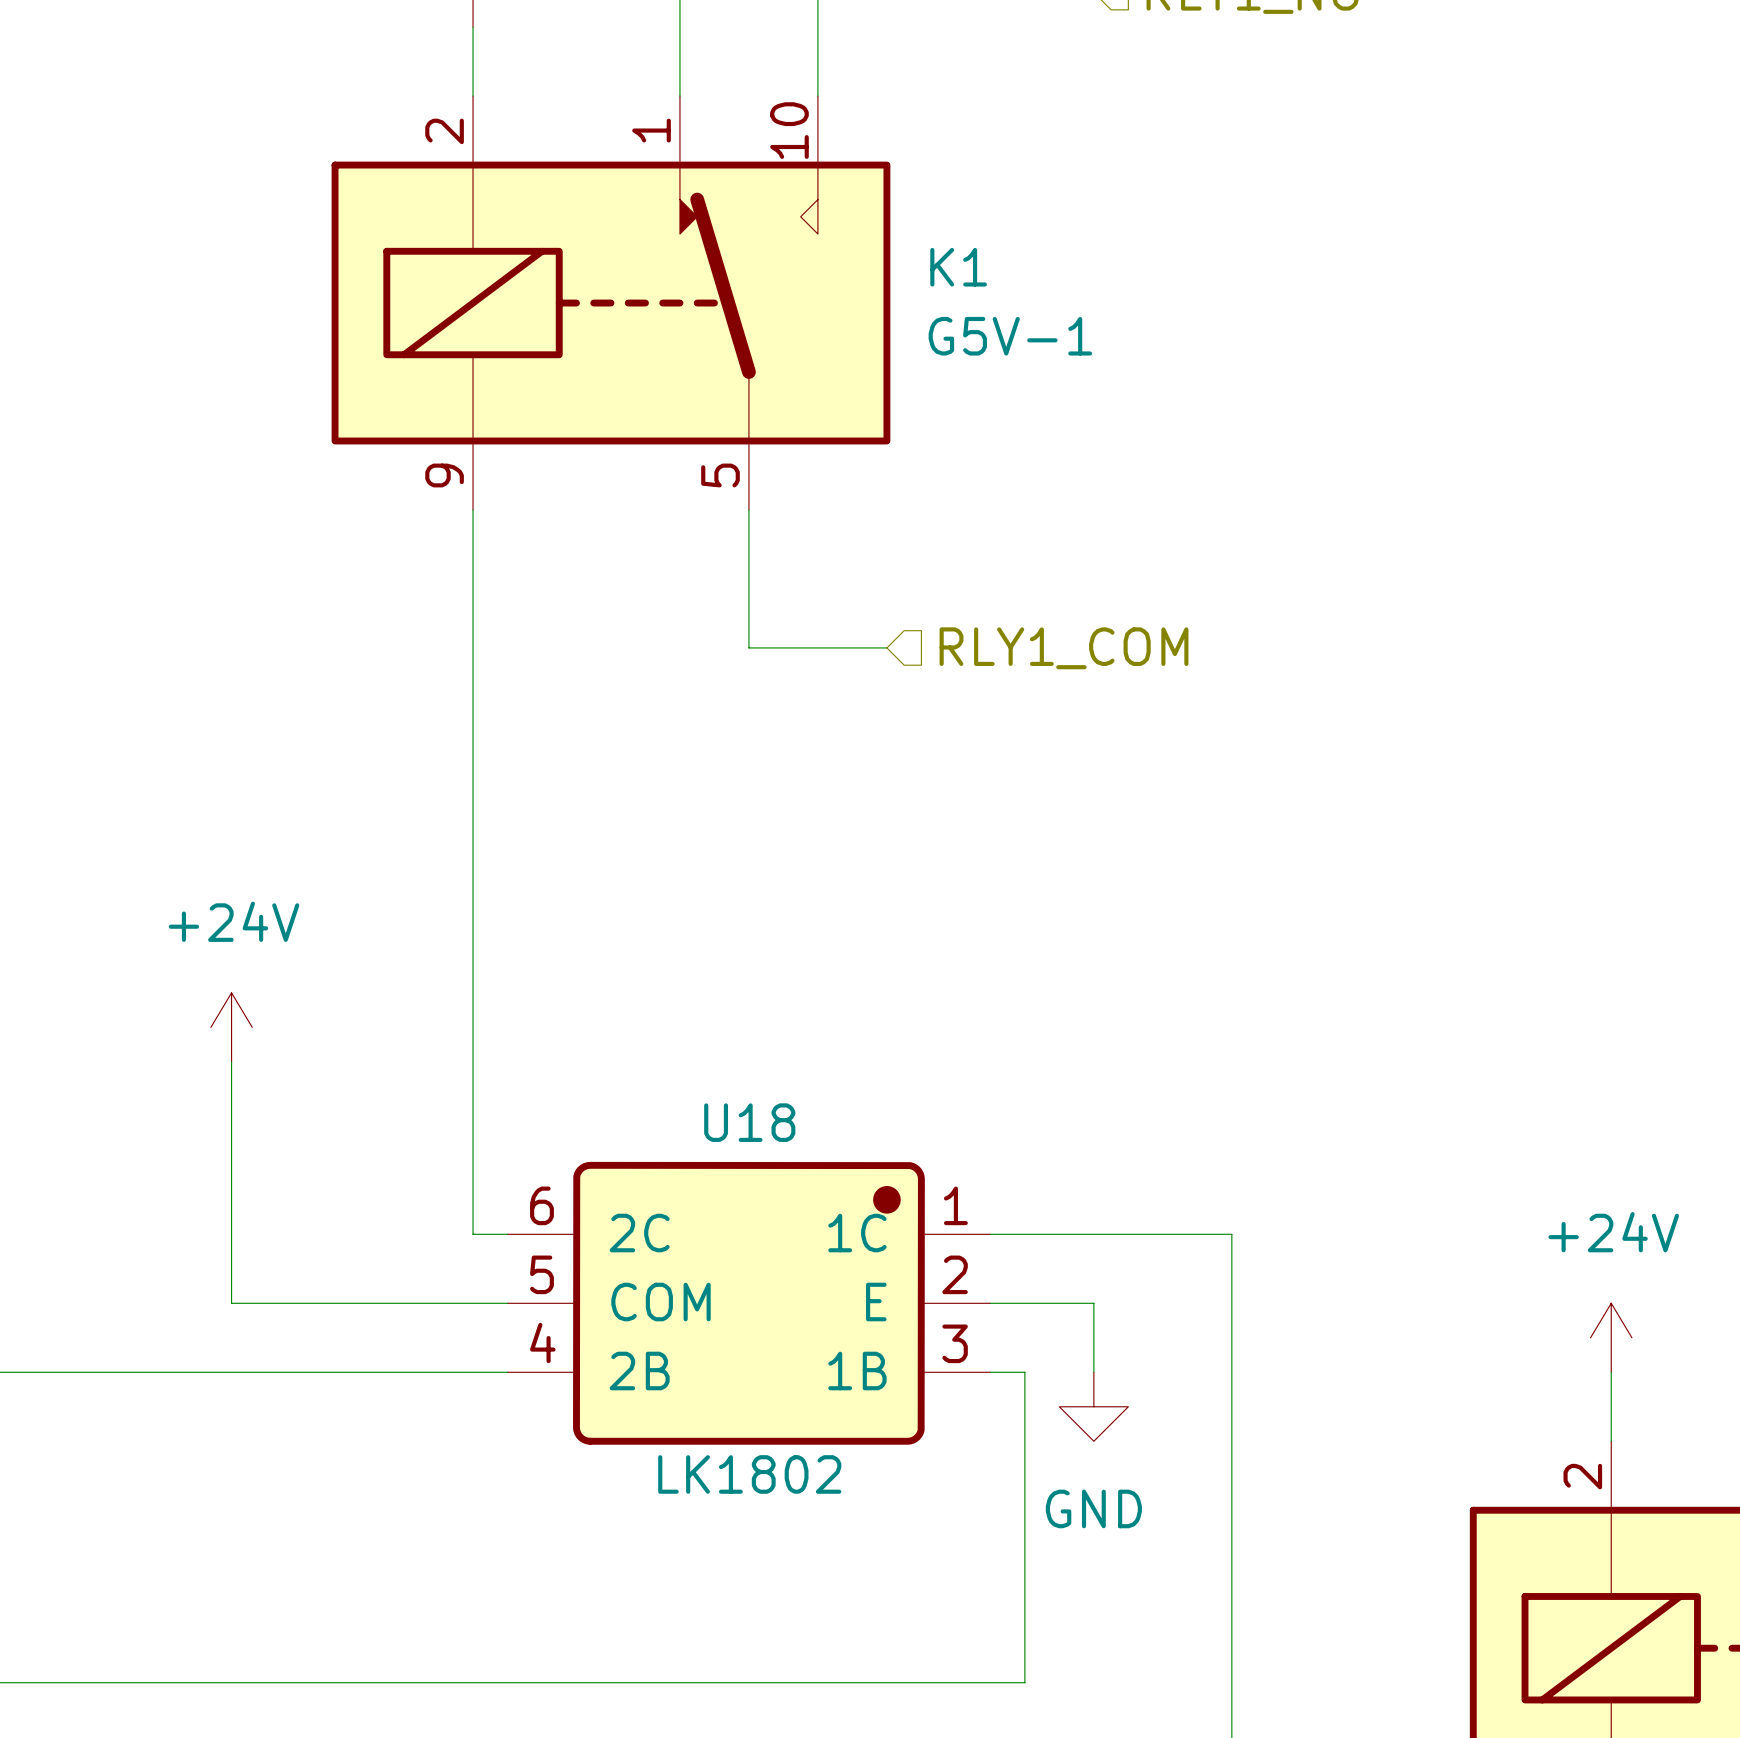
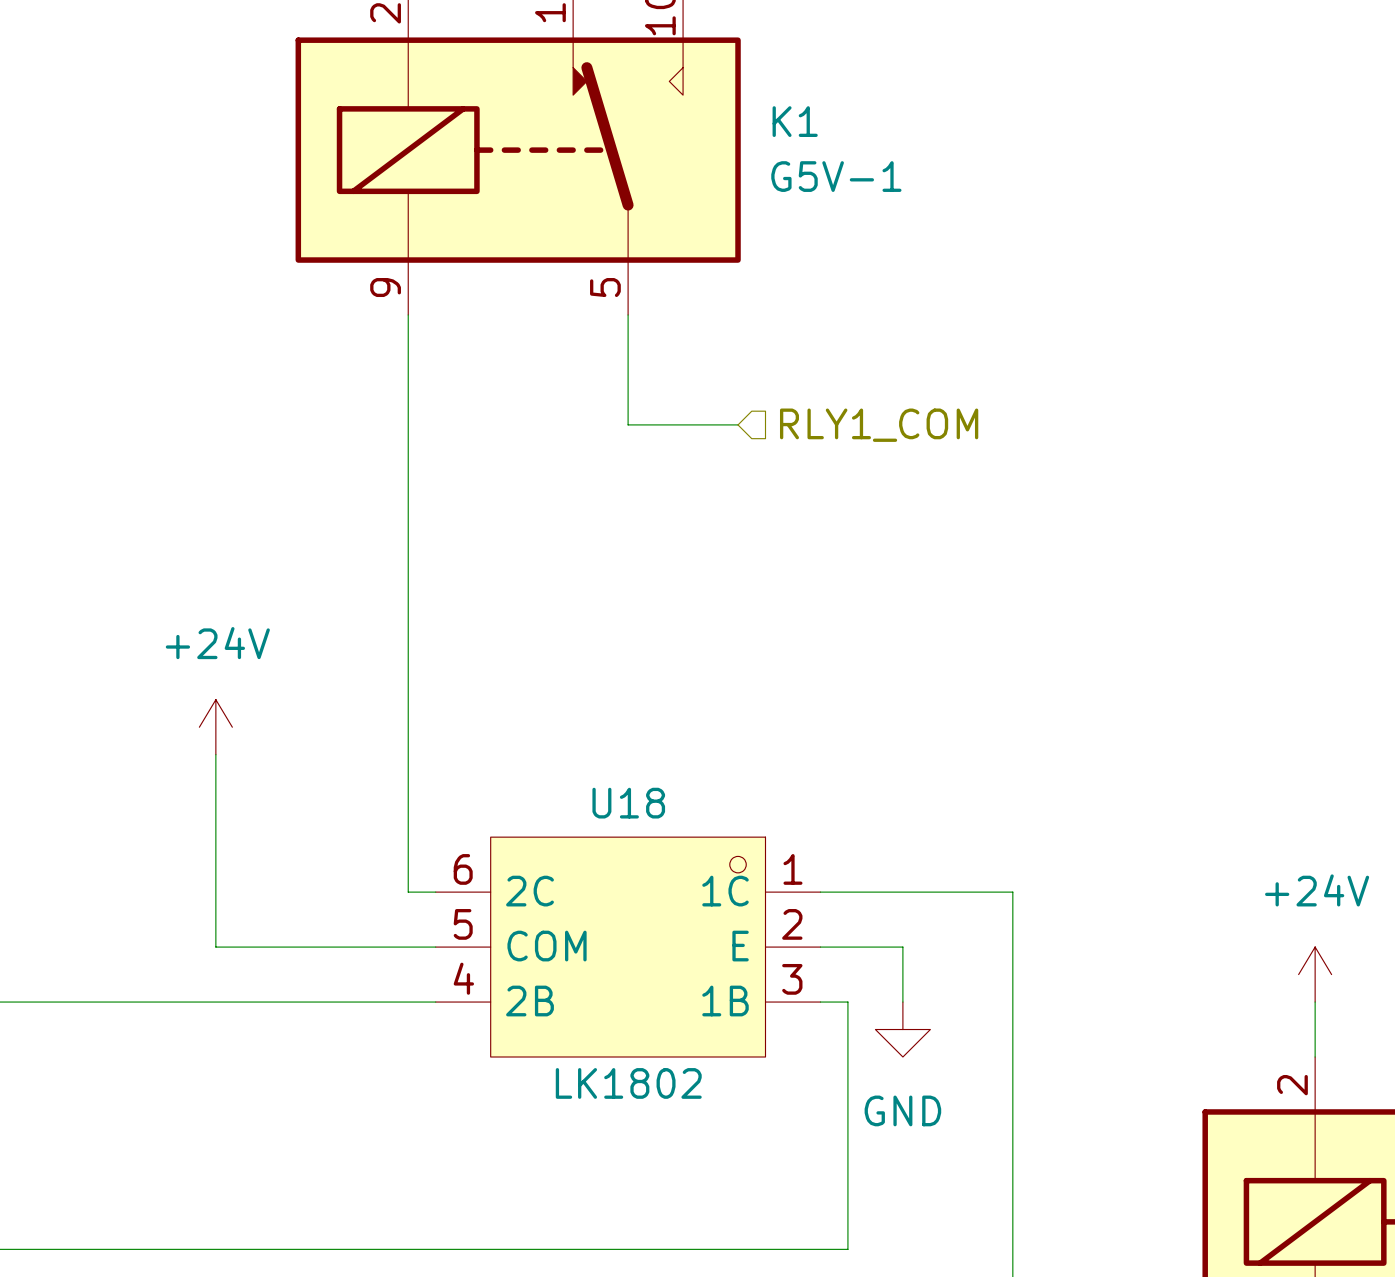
U18 symbol: [507, 1161, 991, 1445] -> [435, 837, 821, 1058]

